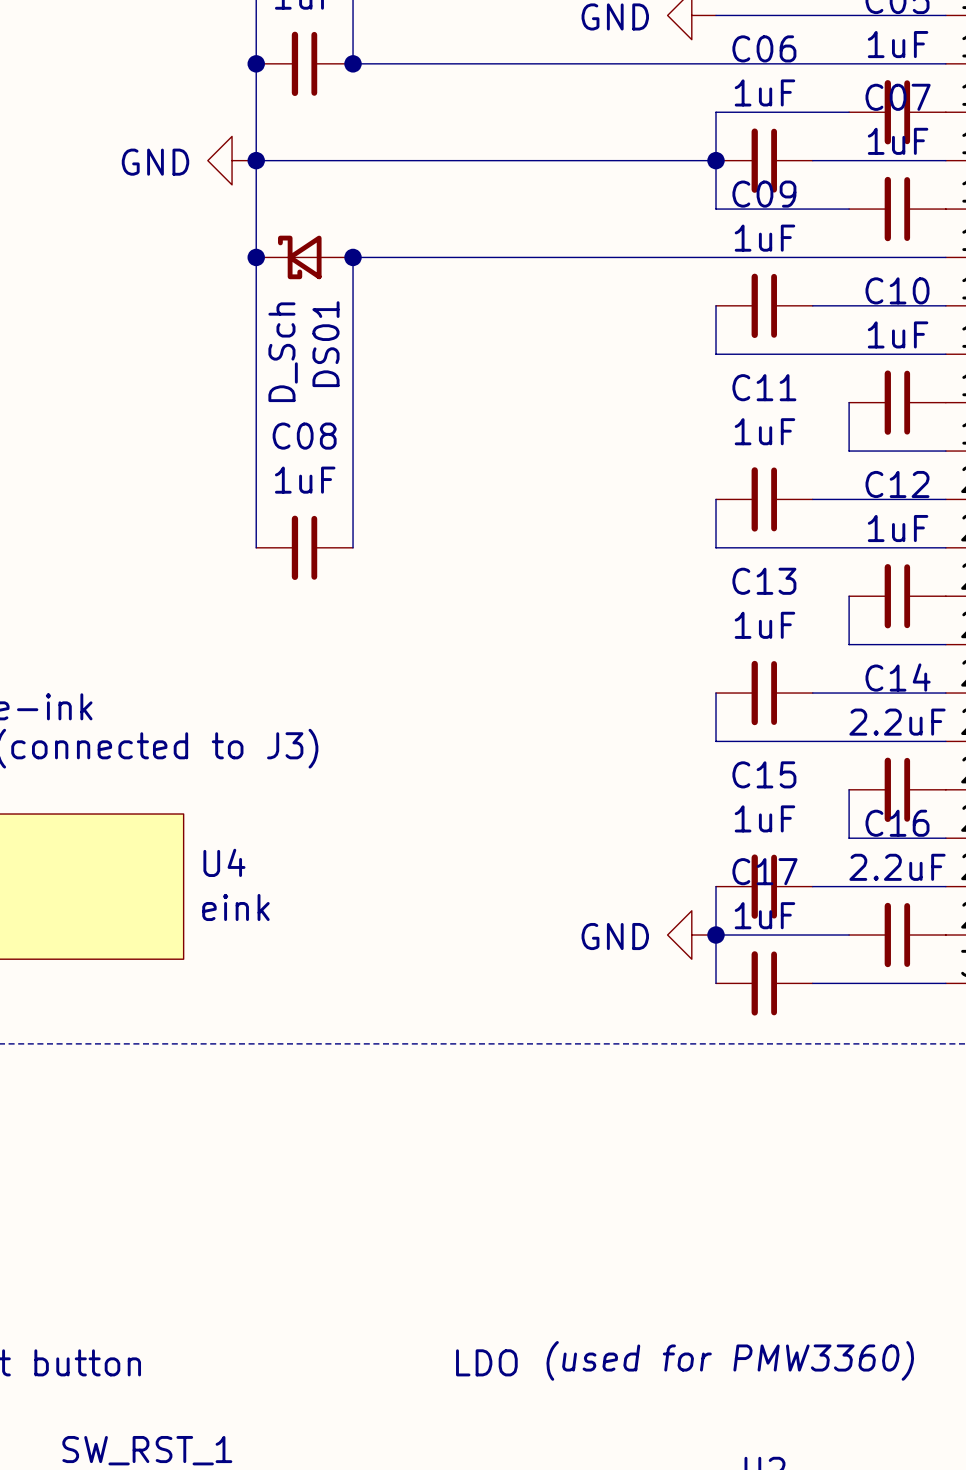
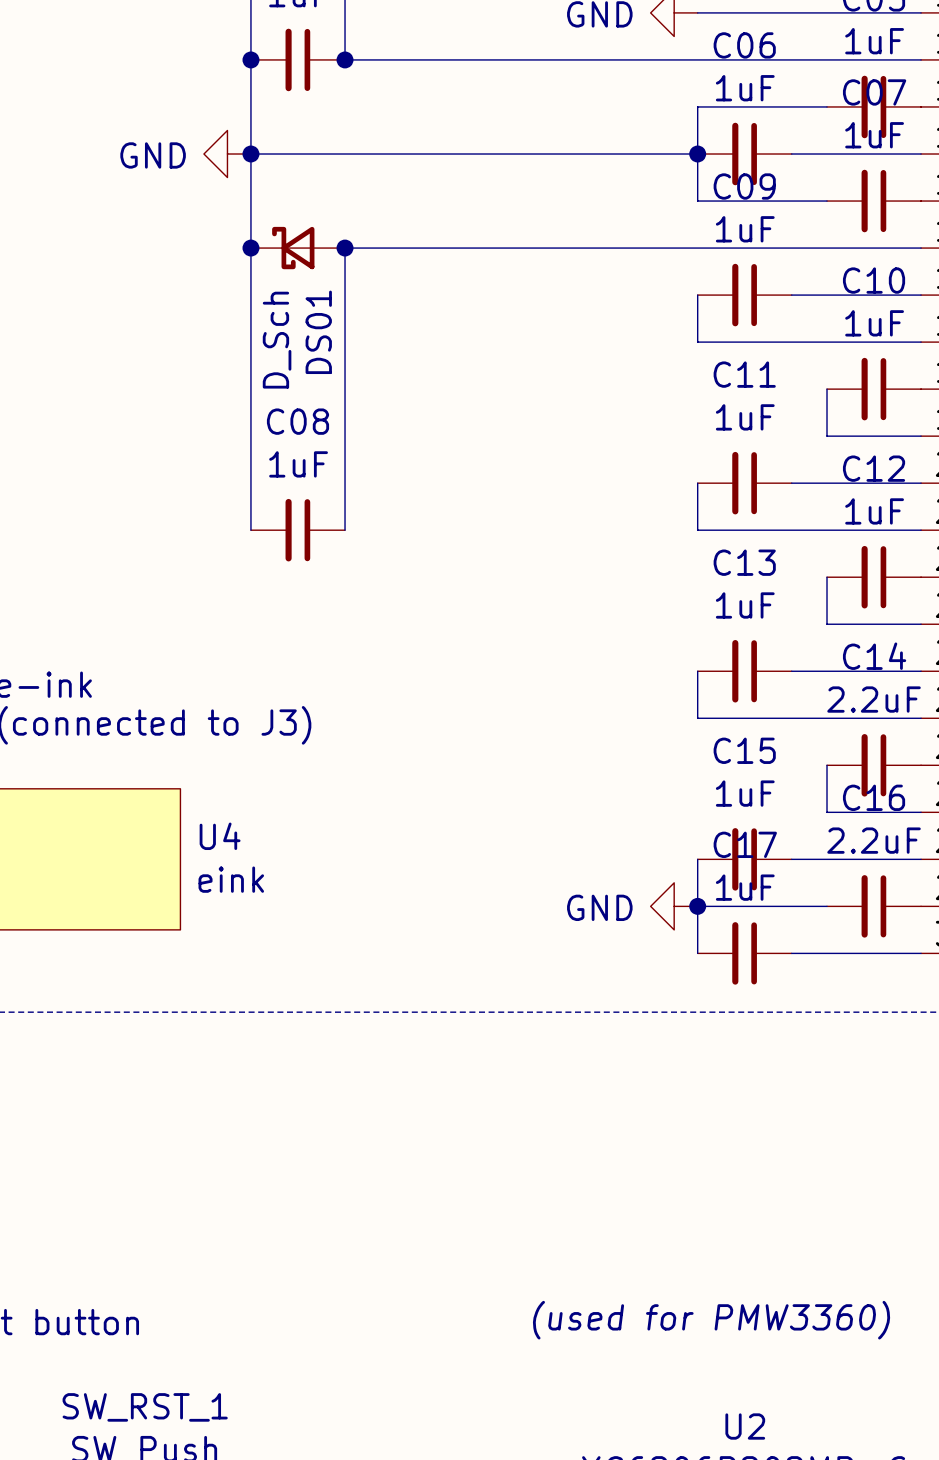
text: LDO (486, 1362) -> none

